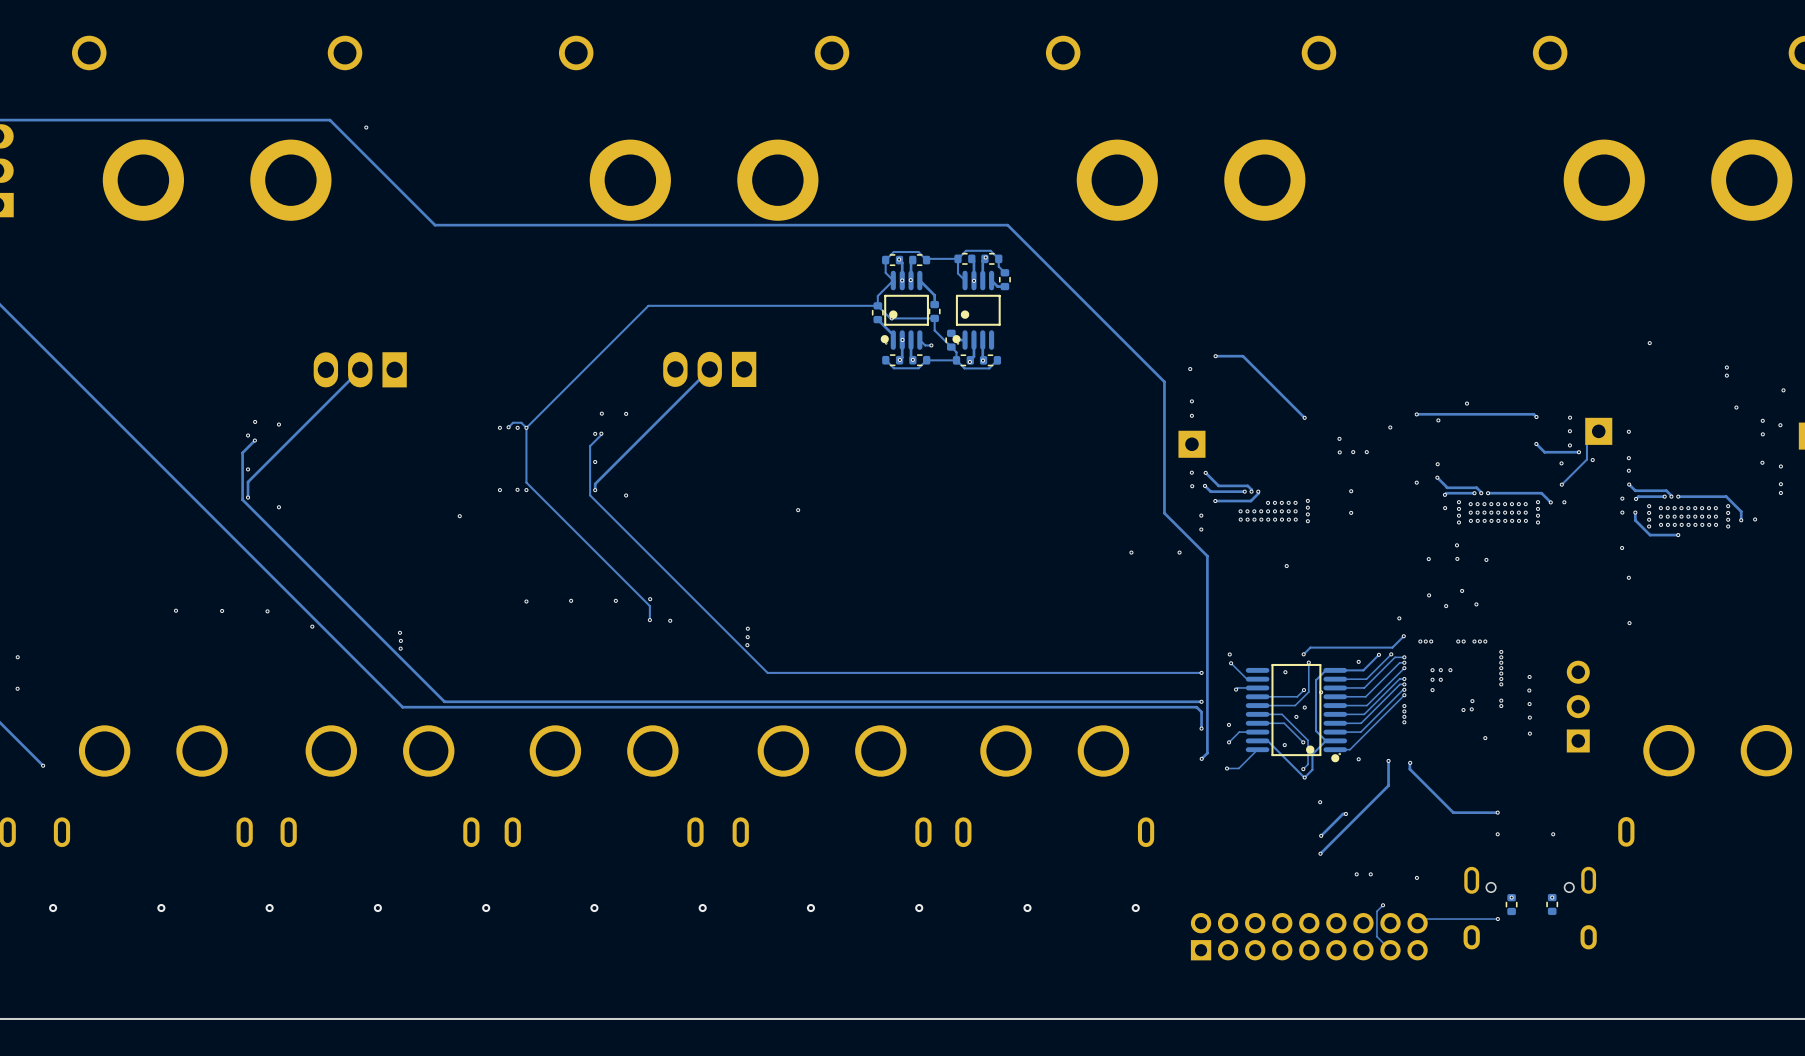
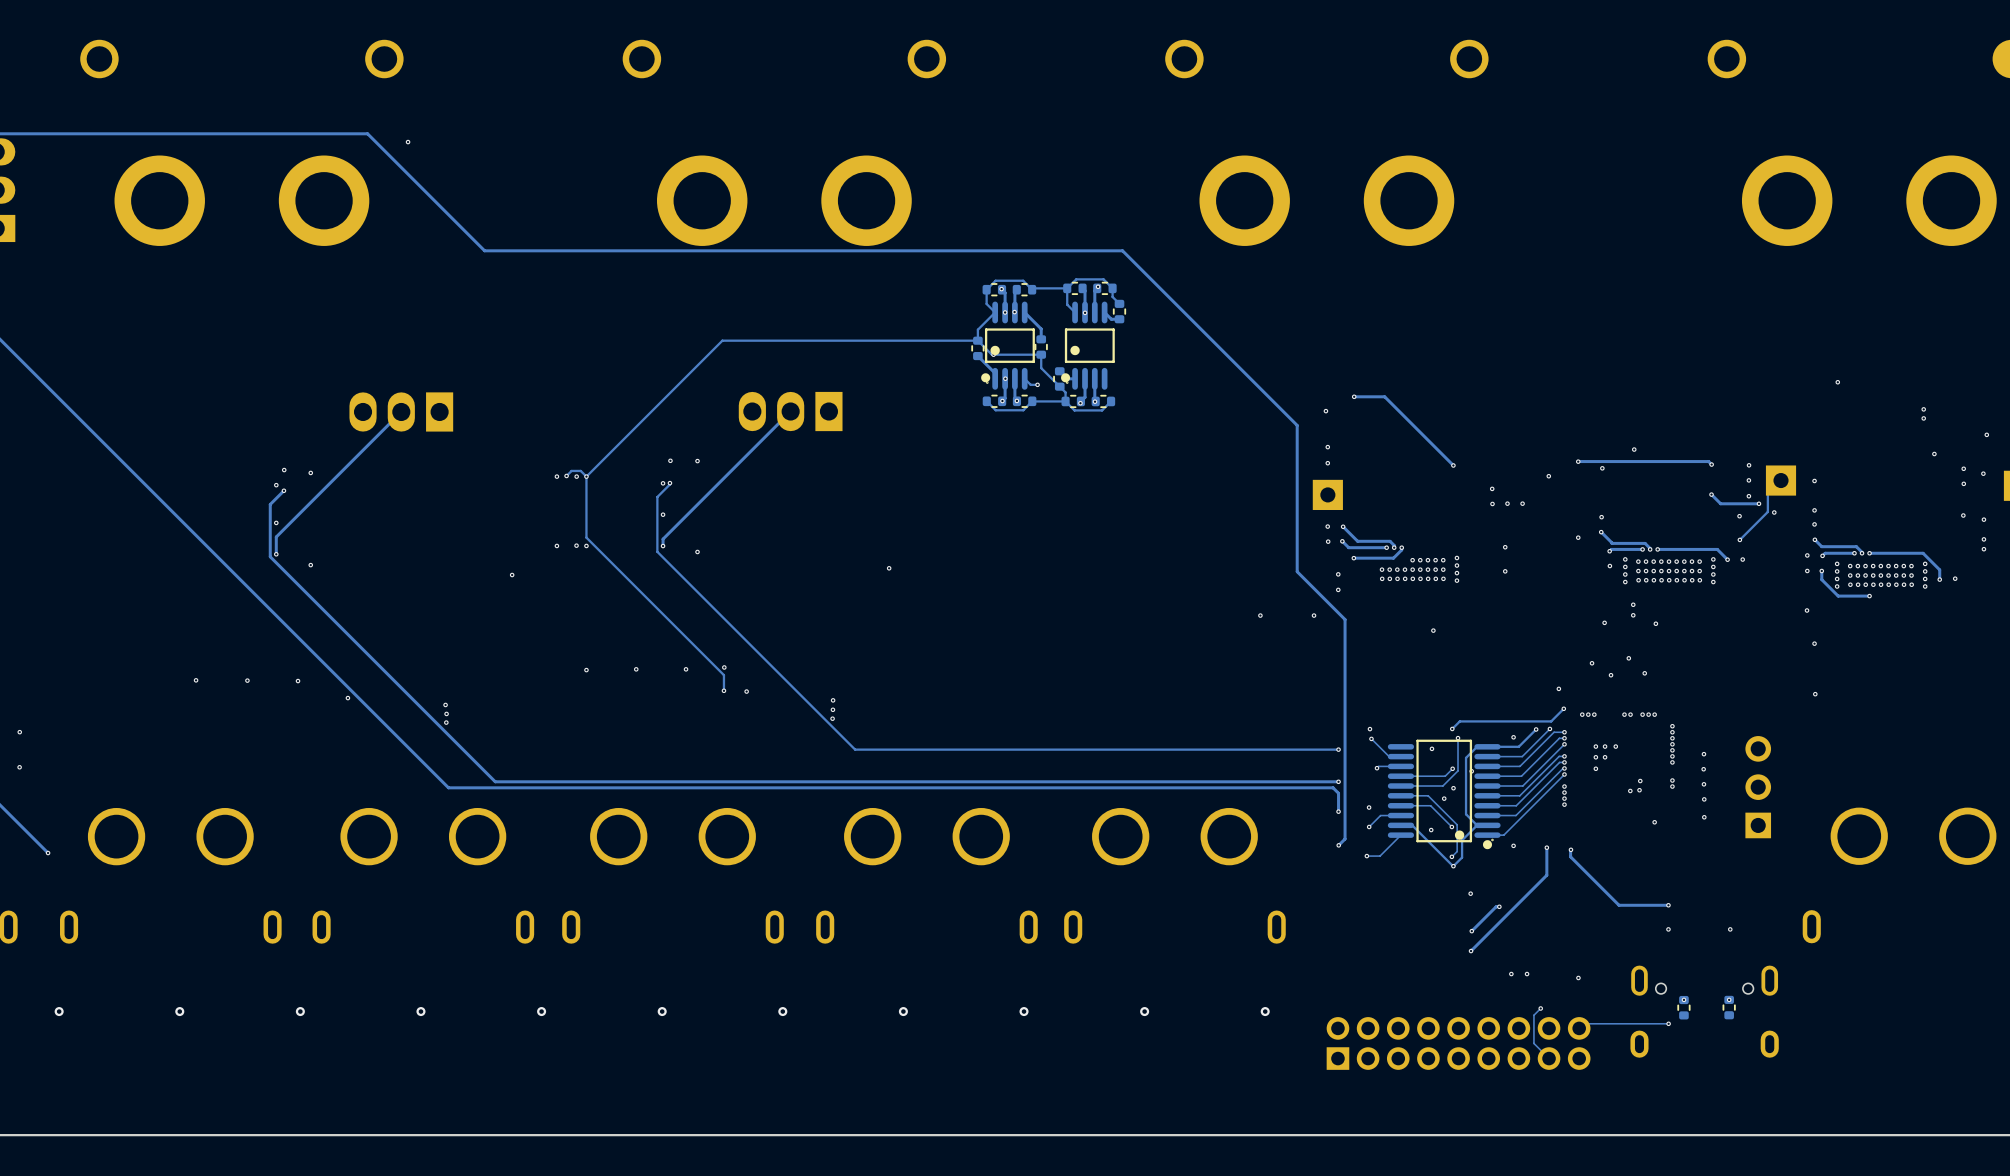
via: none -> (1633, 604)
via: (1456, 545) -> none
via: none -> (1633, 615)
via: (1457, 558) -> none
via: (1428, 559) -> none
via: none -> (1604, 622)

